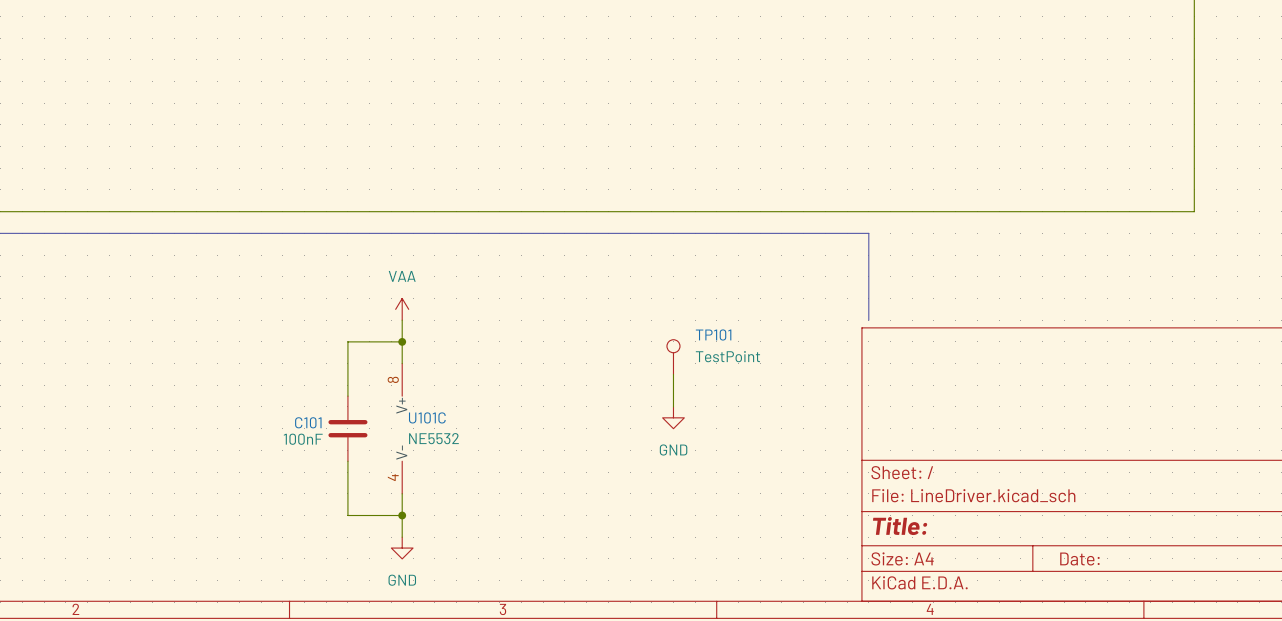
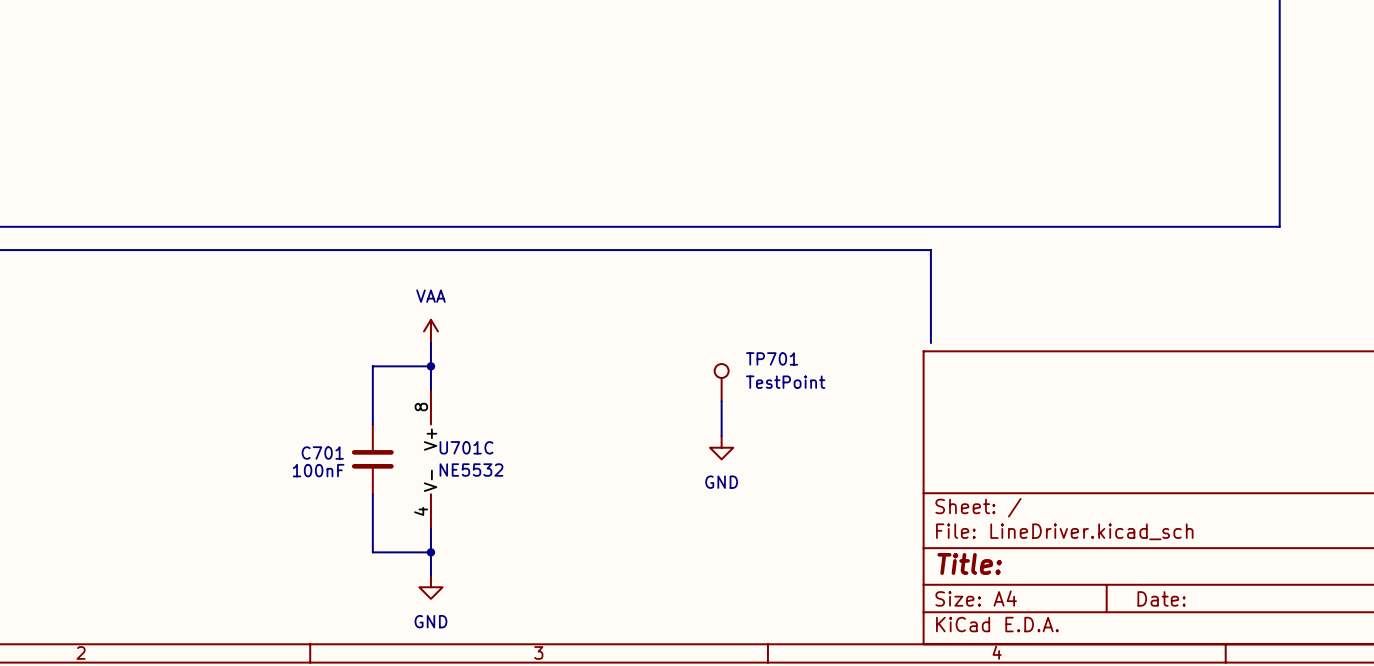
TP101 name: TP101 (713, 334) -> TP701 (772, 358)
U101C name: U101C (427, 417) -> U701C (466, 447)
C101 name: C101 (308, 422) -> C701 (322, 453)

